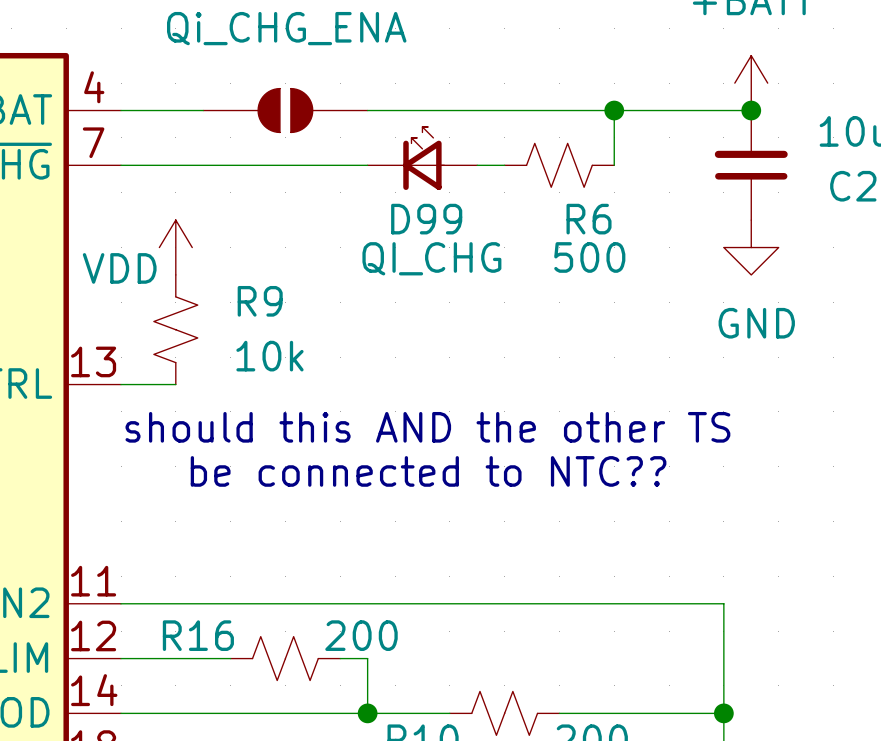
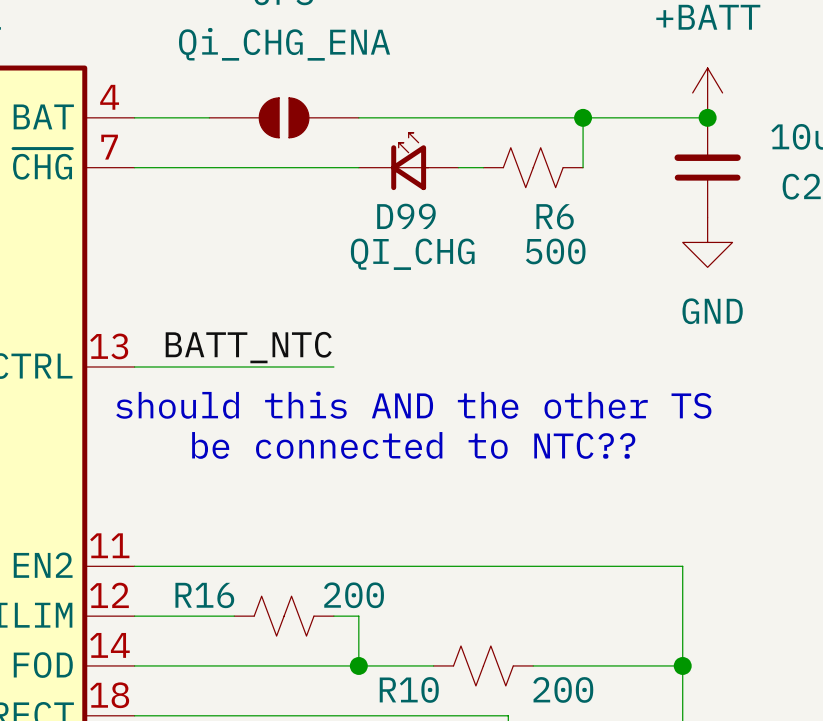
power symbol: VDD (175, 247) -> none
R9: 10k (175, 329) -> none
label: none -> BATT_NTC (248, 347)
wire: none -> (184, 366) (333, 366)

